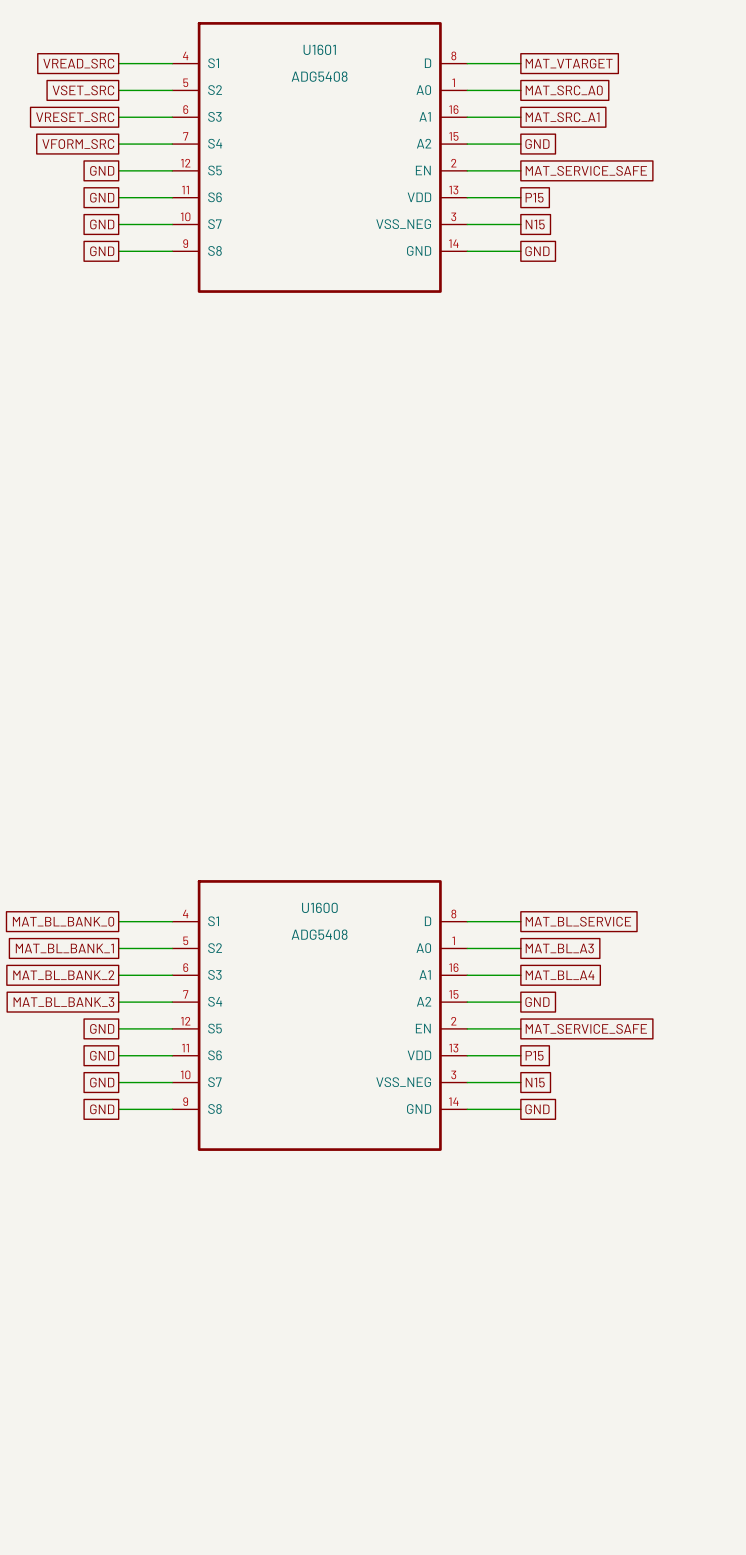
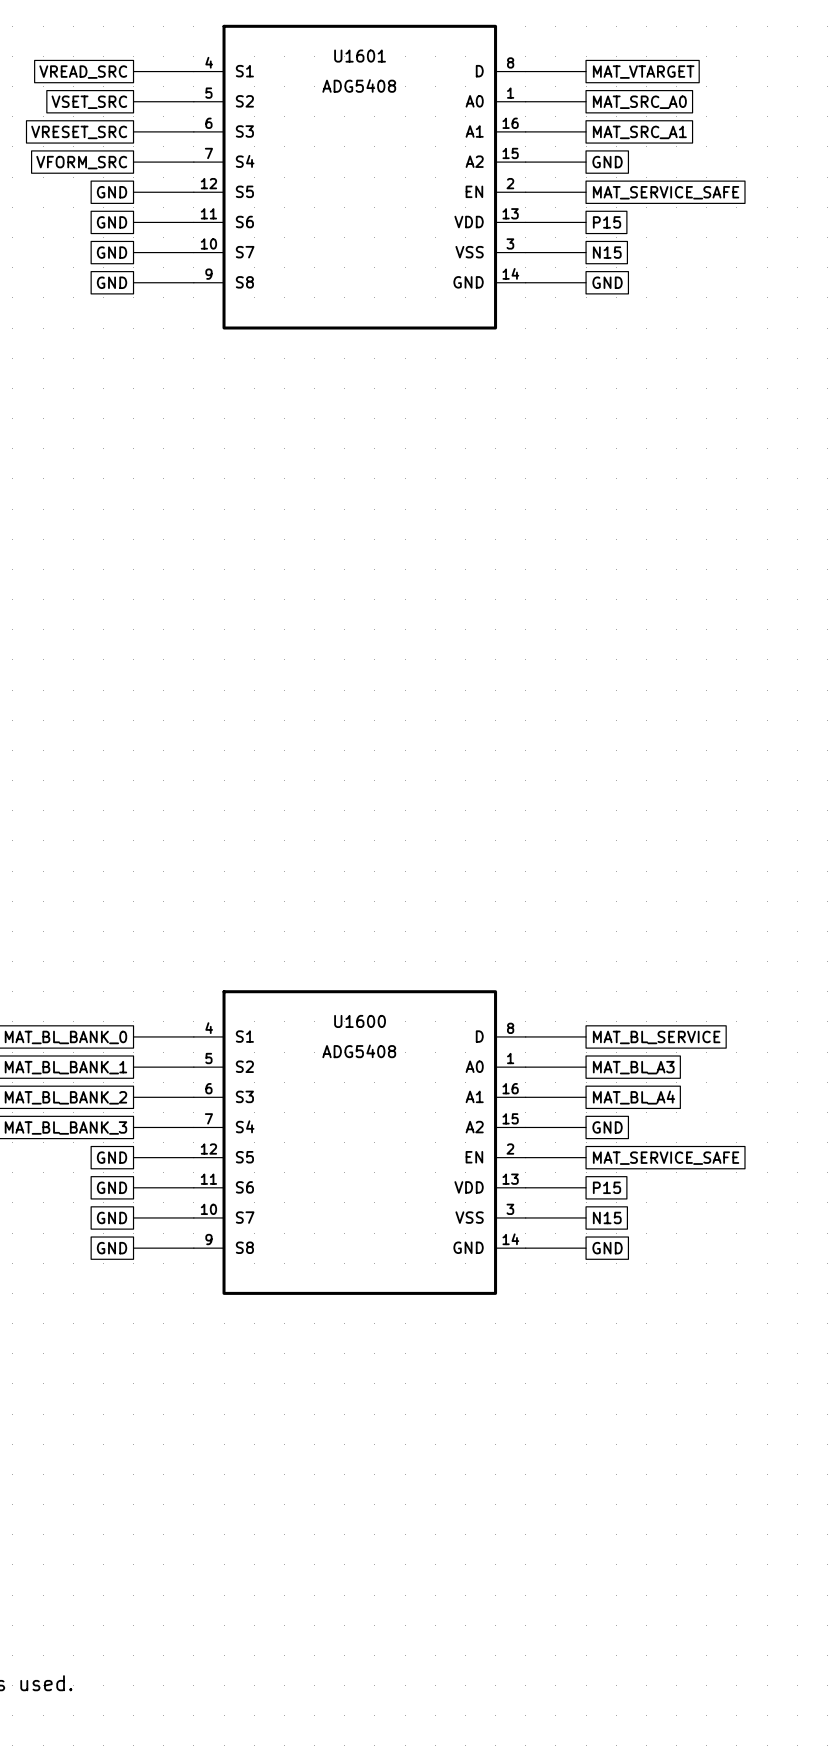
U1601 pin name: VSS_NEG (403, 224) -> VSS (469, 252)
U1600 pin name: VSS_NEG (403, 1082) -> VSS (469, 1217)

